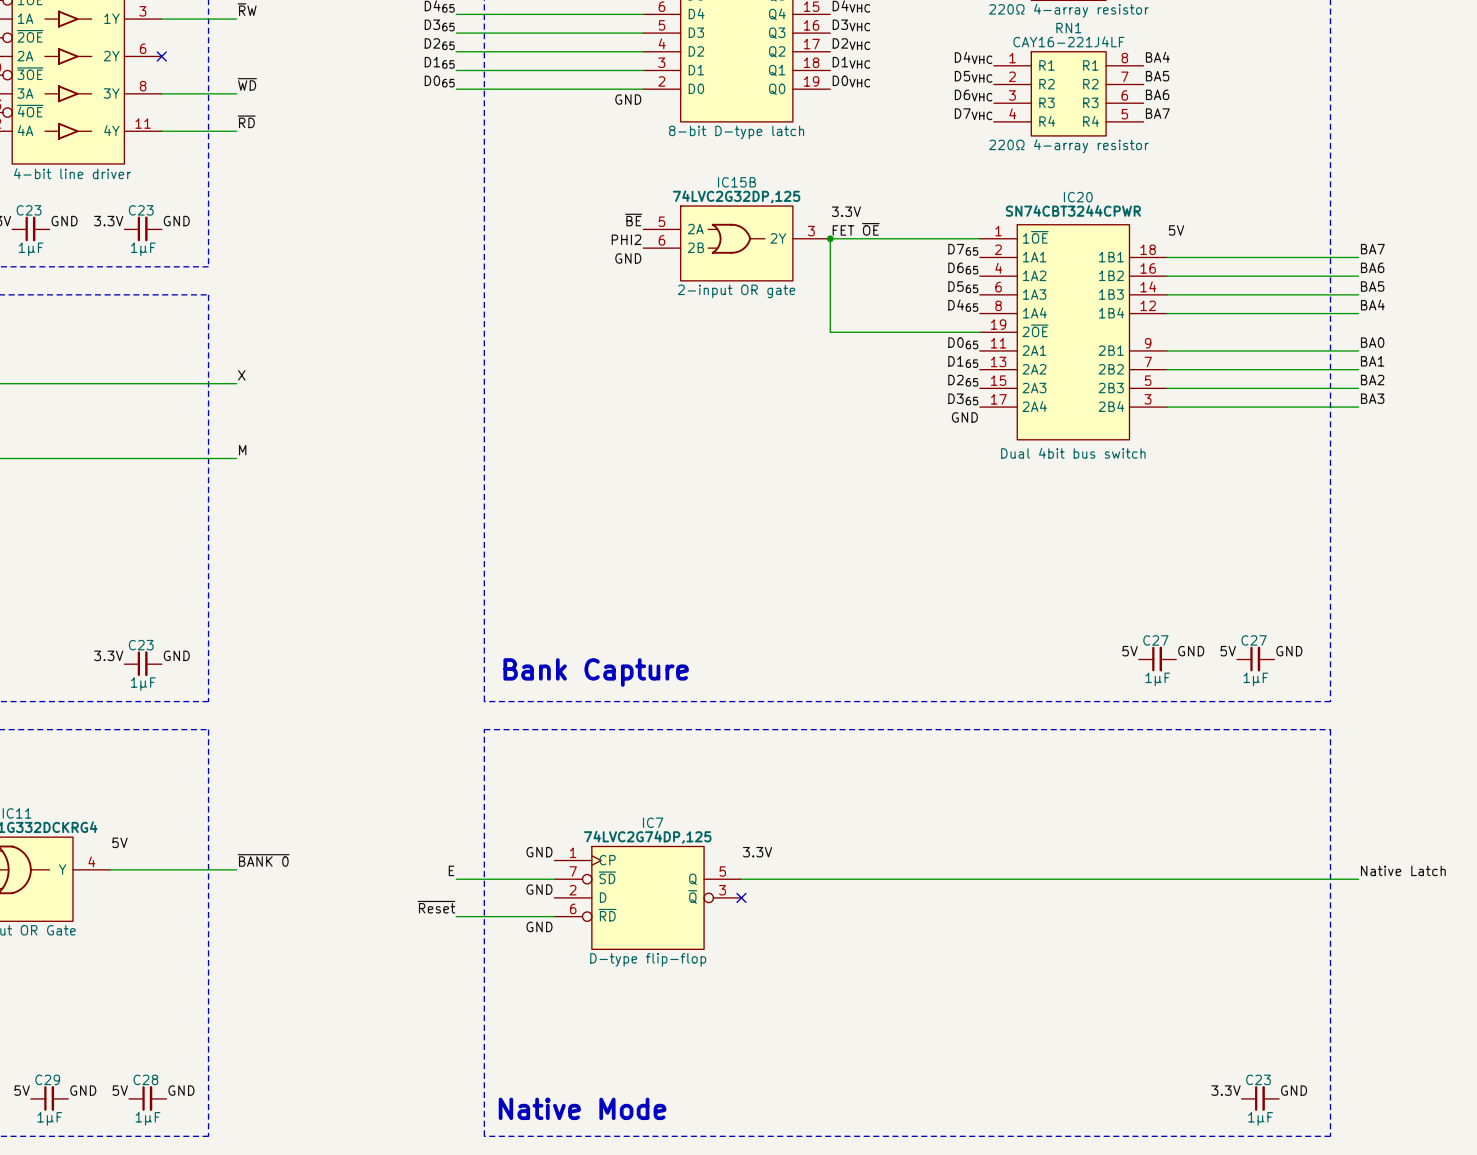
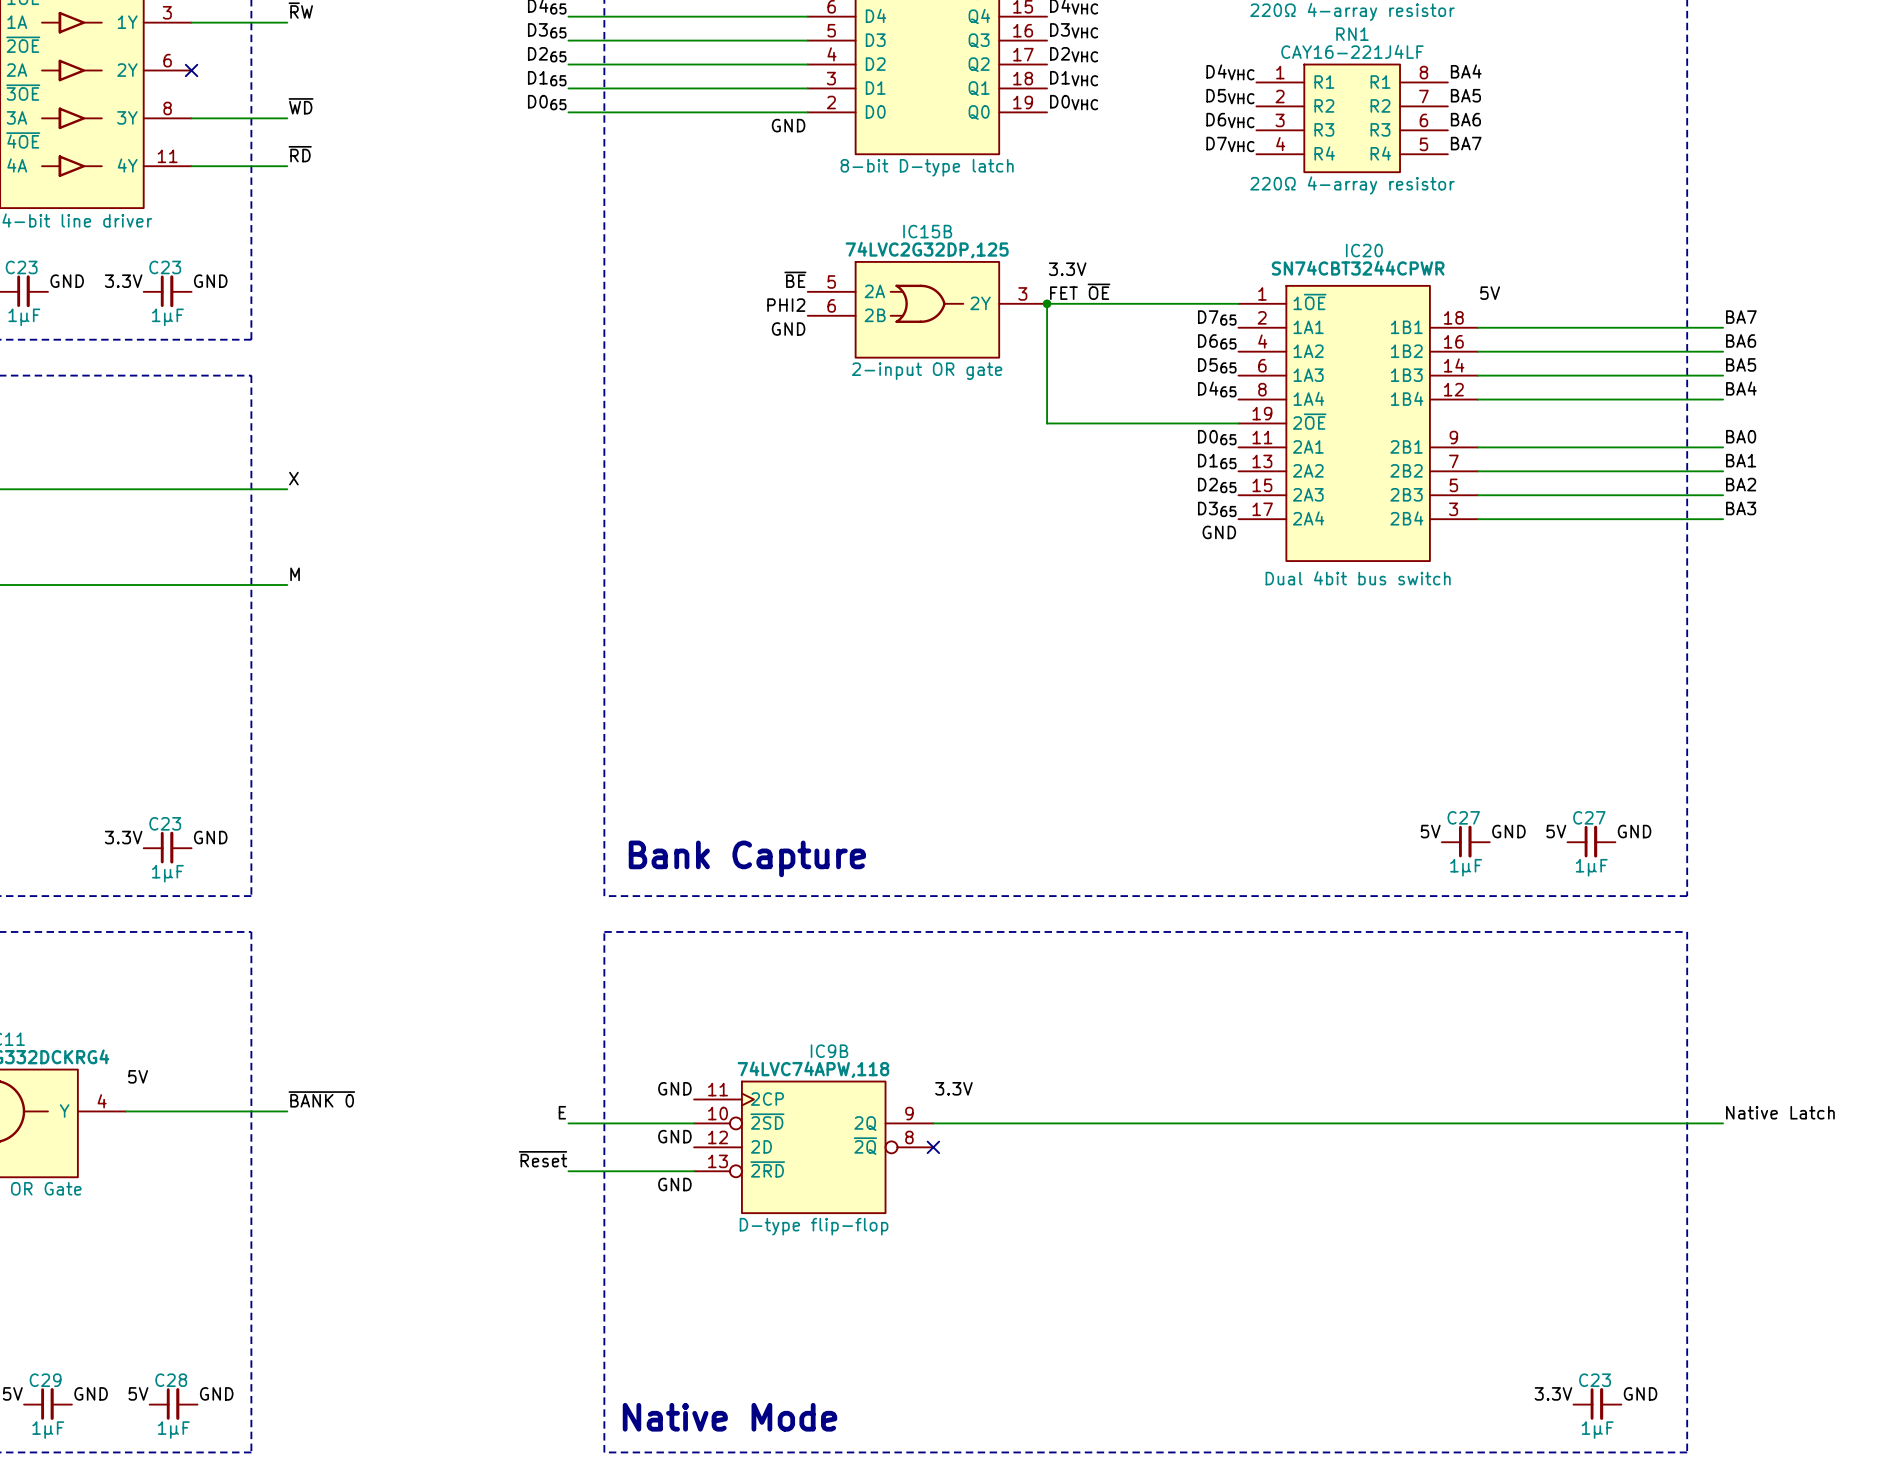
IC7 name: IC7 (653, 822) -> IC9B (829, 1051)
IC7 value: 74LVC2G74DP,125 (647, 837) -> 74LVC74APW,118 (813, 1069)
IC7 symbol: [554, 845, 742, 950] -> [694, 1080, 934, 1214]

